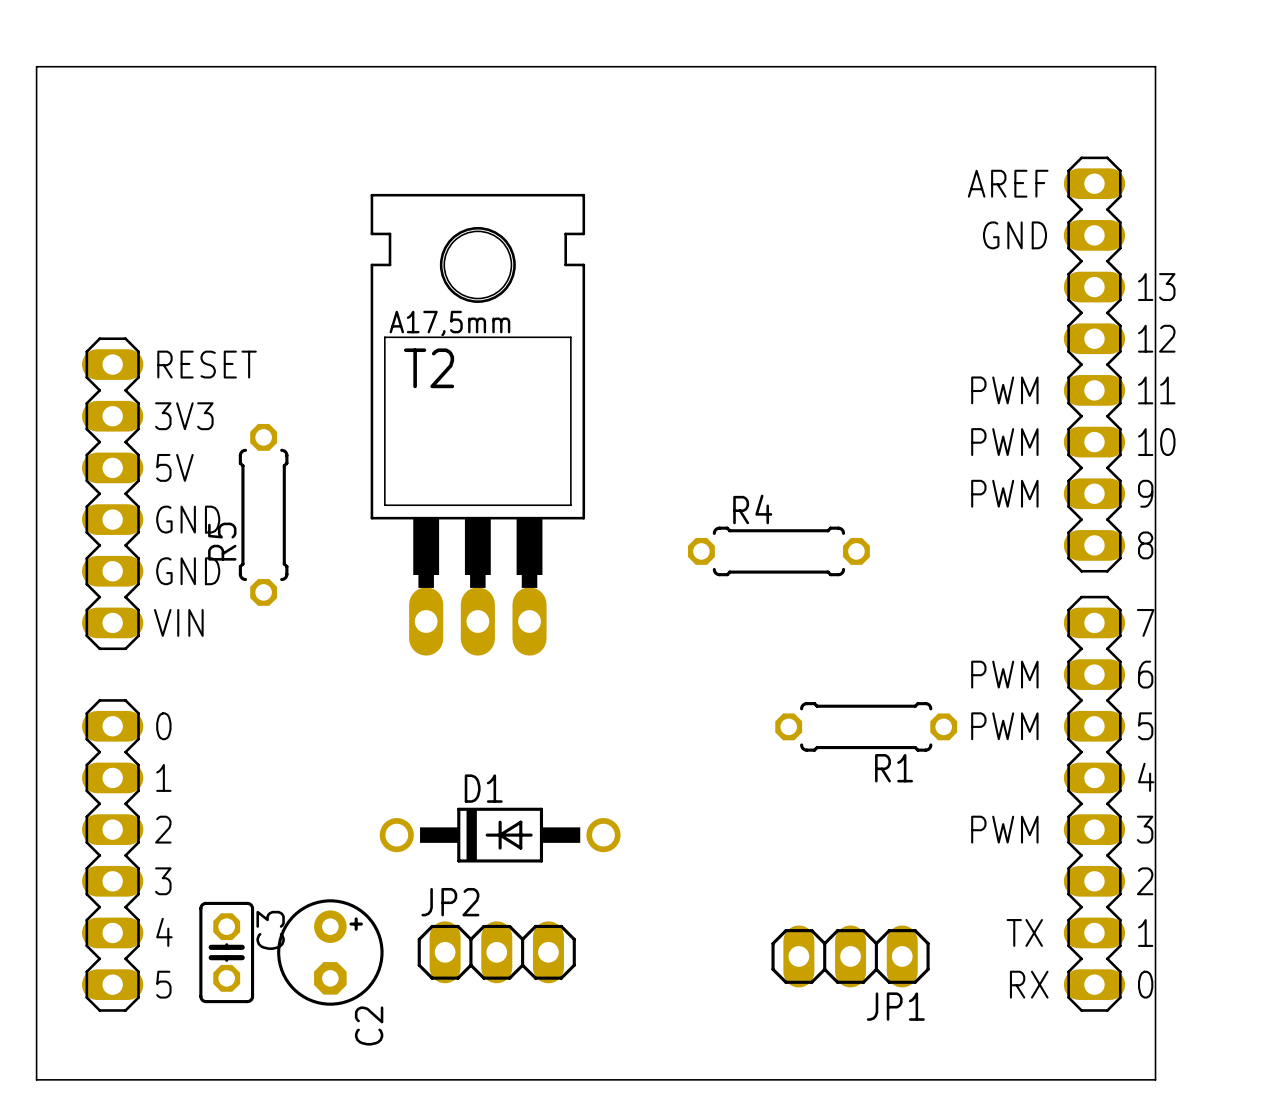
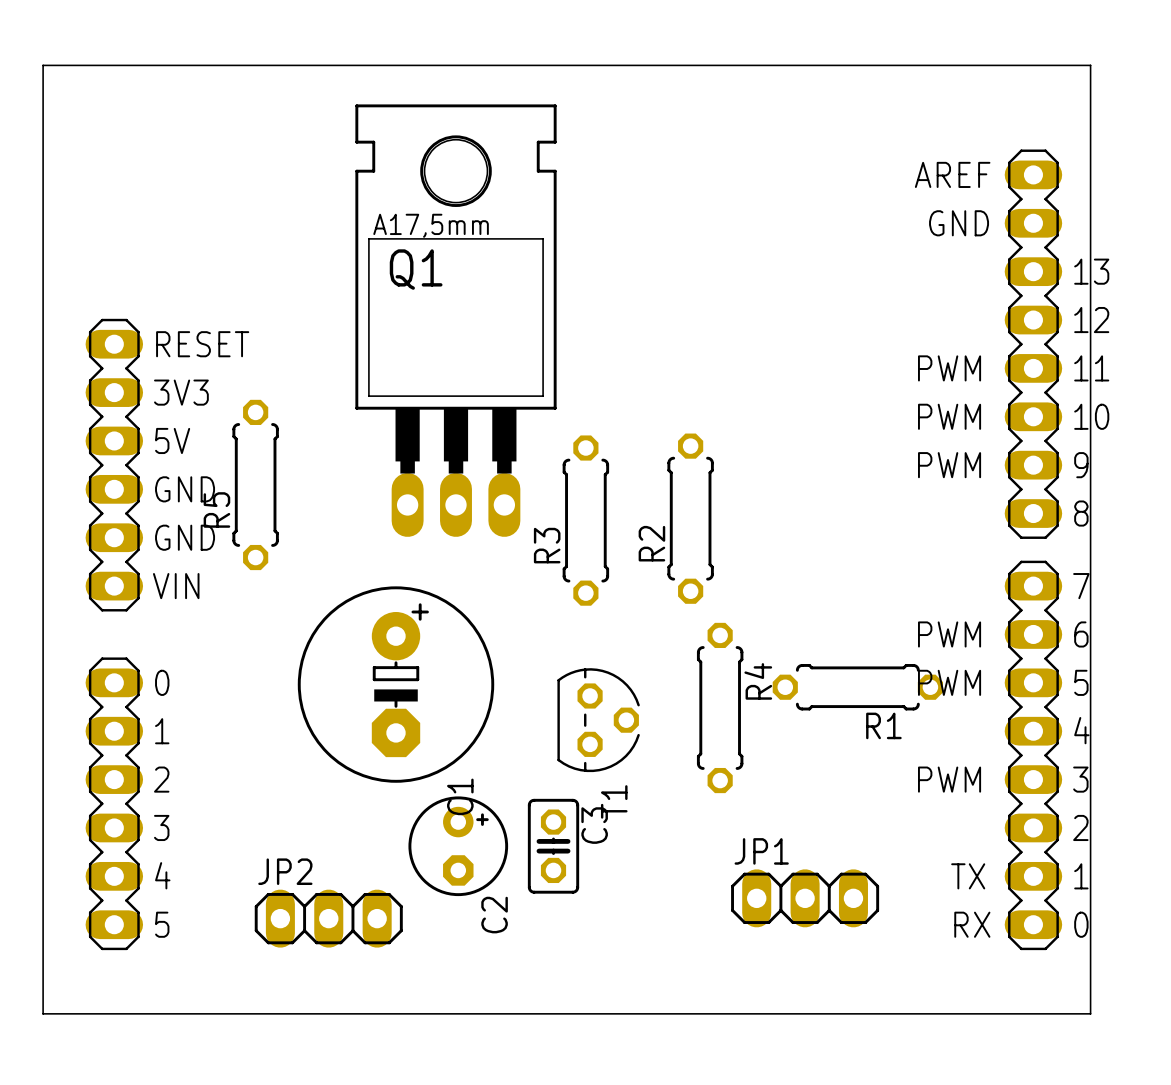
Q1: none -> (455, 320)
T2: (477, 424) -> none
R2: none -> (690, 518)
R4 rotation: 0° (778, 551) -> 90° clockwise (720, 707)
R4 position: (778, 551) -> (720, 707)
R3: none -> (585, 520)
R1 position: (866, 726) -> (857, 687)
C1: none -> (396, 684)
T1: none -> (598, 720)
D1: (500, 835) -> none
C3 position: (226, 952) -> (553, 846)
C2 position: (330, 952) -> (458, 846)
JP2 position: (496, 952) -> (328, 918)
JP1 name position: JP1 (895, 1006) -> JP1 (761, 851)

